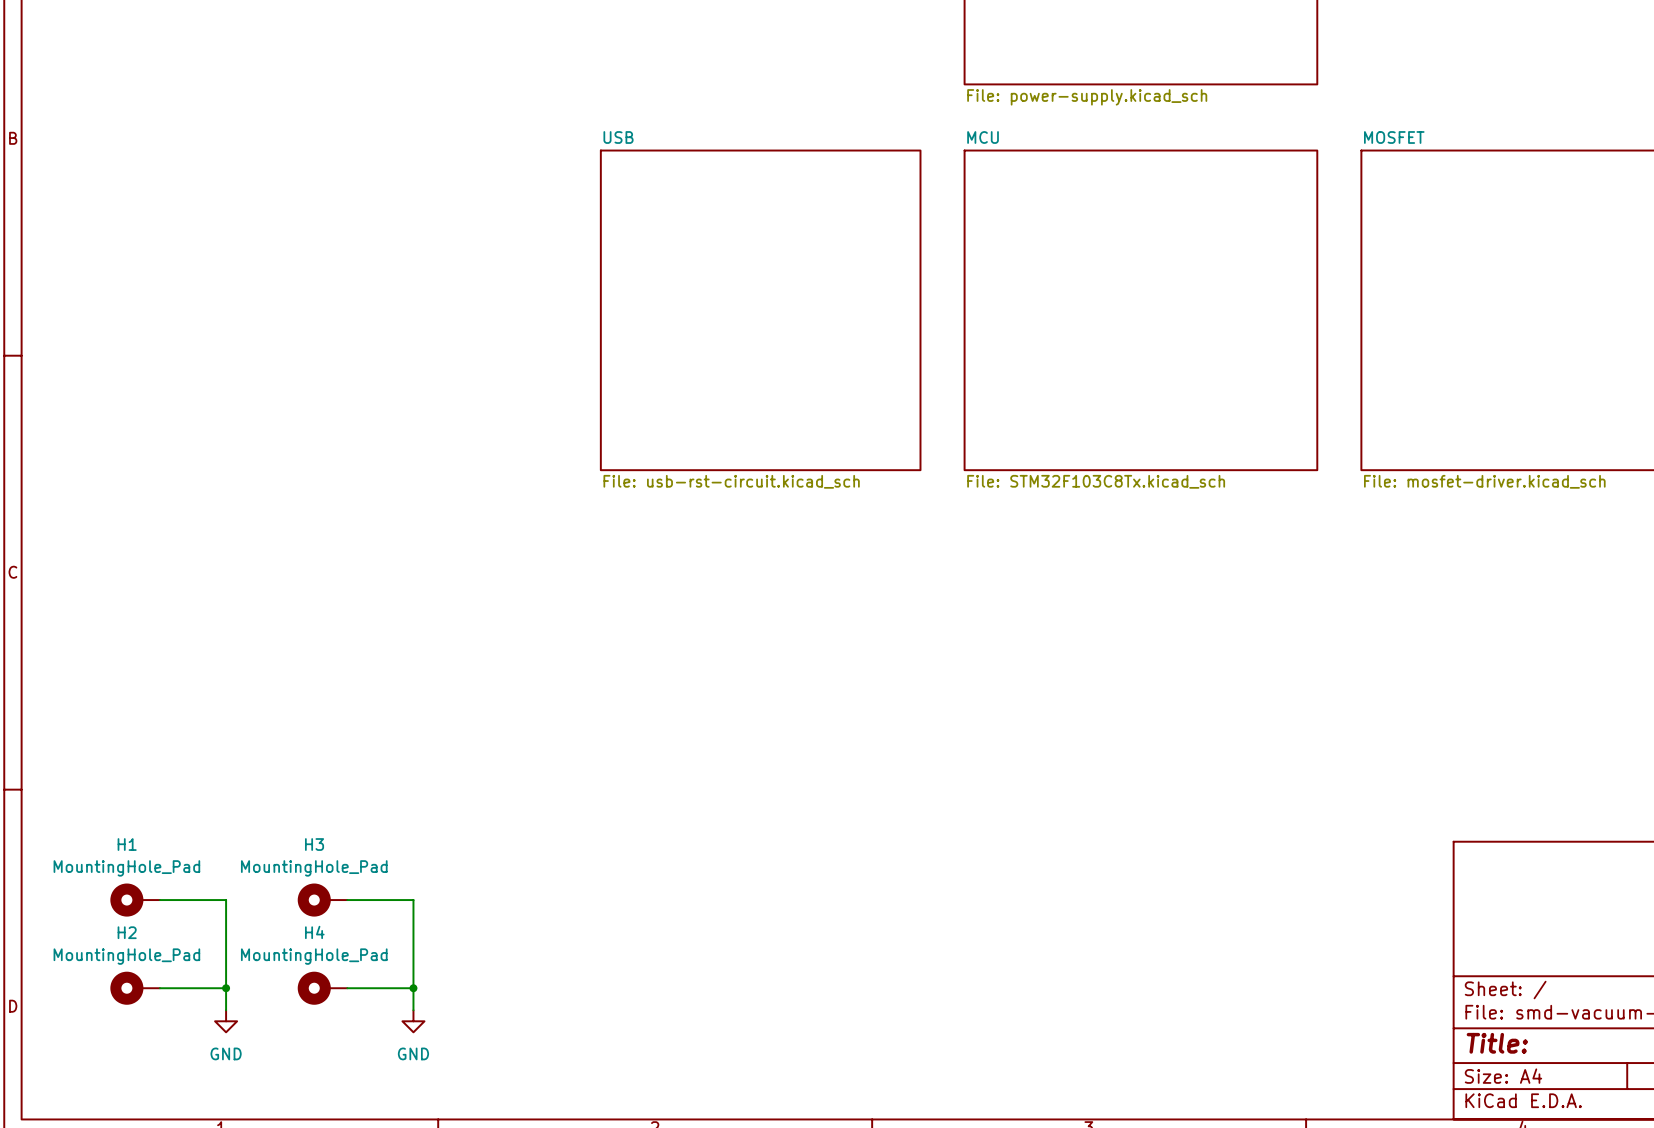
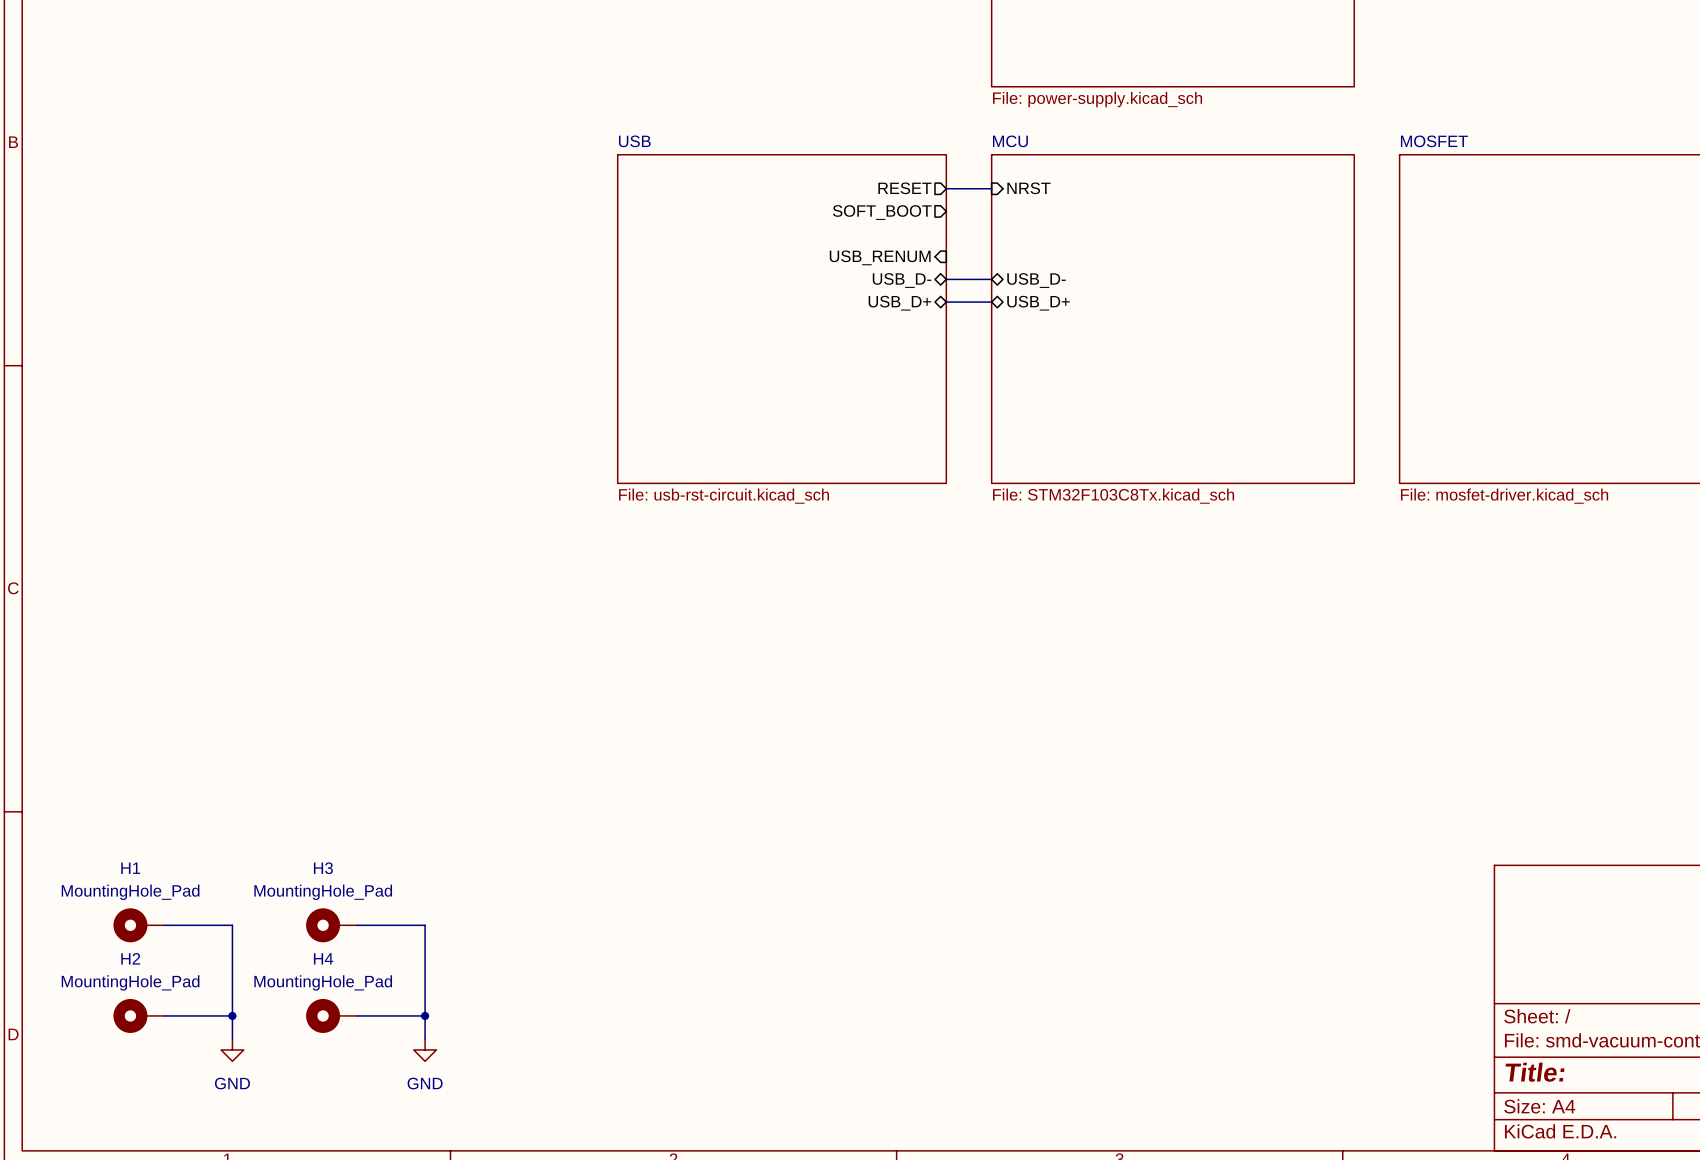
sheet pin: none -> RESET (904, 188)
wire: none -> (946, 188) (991, 188)
sheet pin: none -> NRST (1028, 188)
sheet pin: none -> SOFT_BOOT (882, 212)
sheet pin: none -> USB_RENUM (880, 257)
sheet pin: none -> USB_D- (902, 280)
wire: none -> (946, 279) (991, 279)
sheet pin: none -> USB_D- (1036, 280)
sheet pin: none -> USB_D+ (899, 303)
wire: none -> (946, 302) (991, 302)
sheet pin: none -> USB_D+ (1038, 303)

